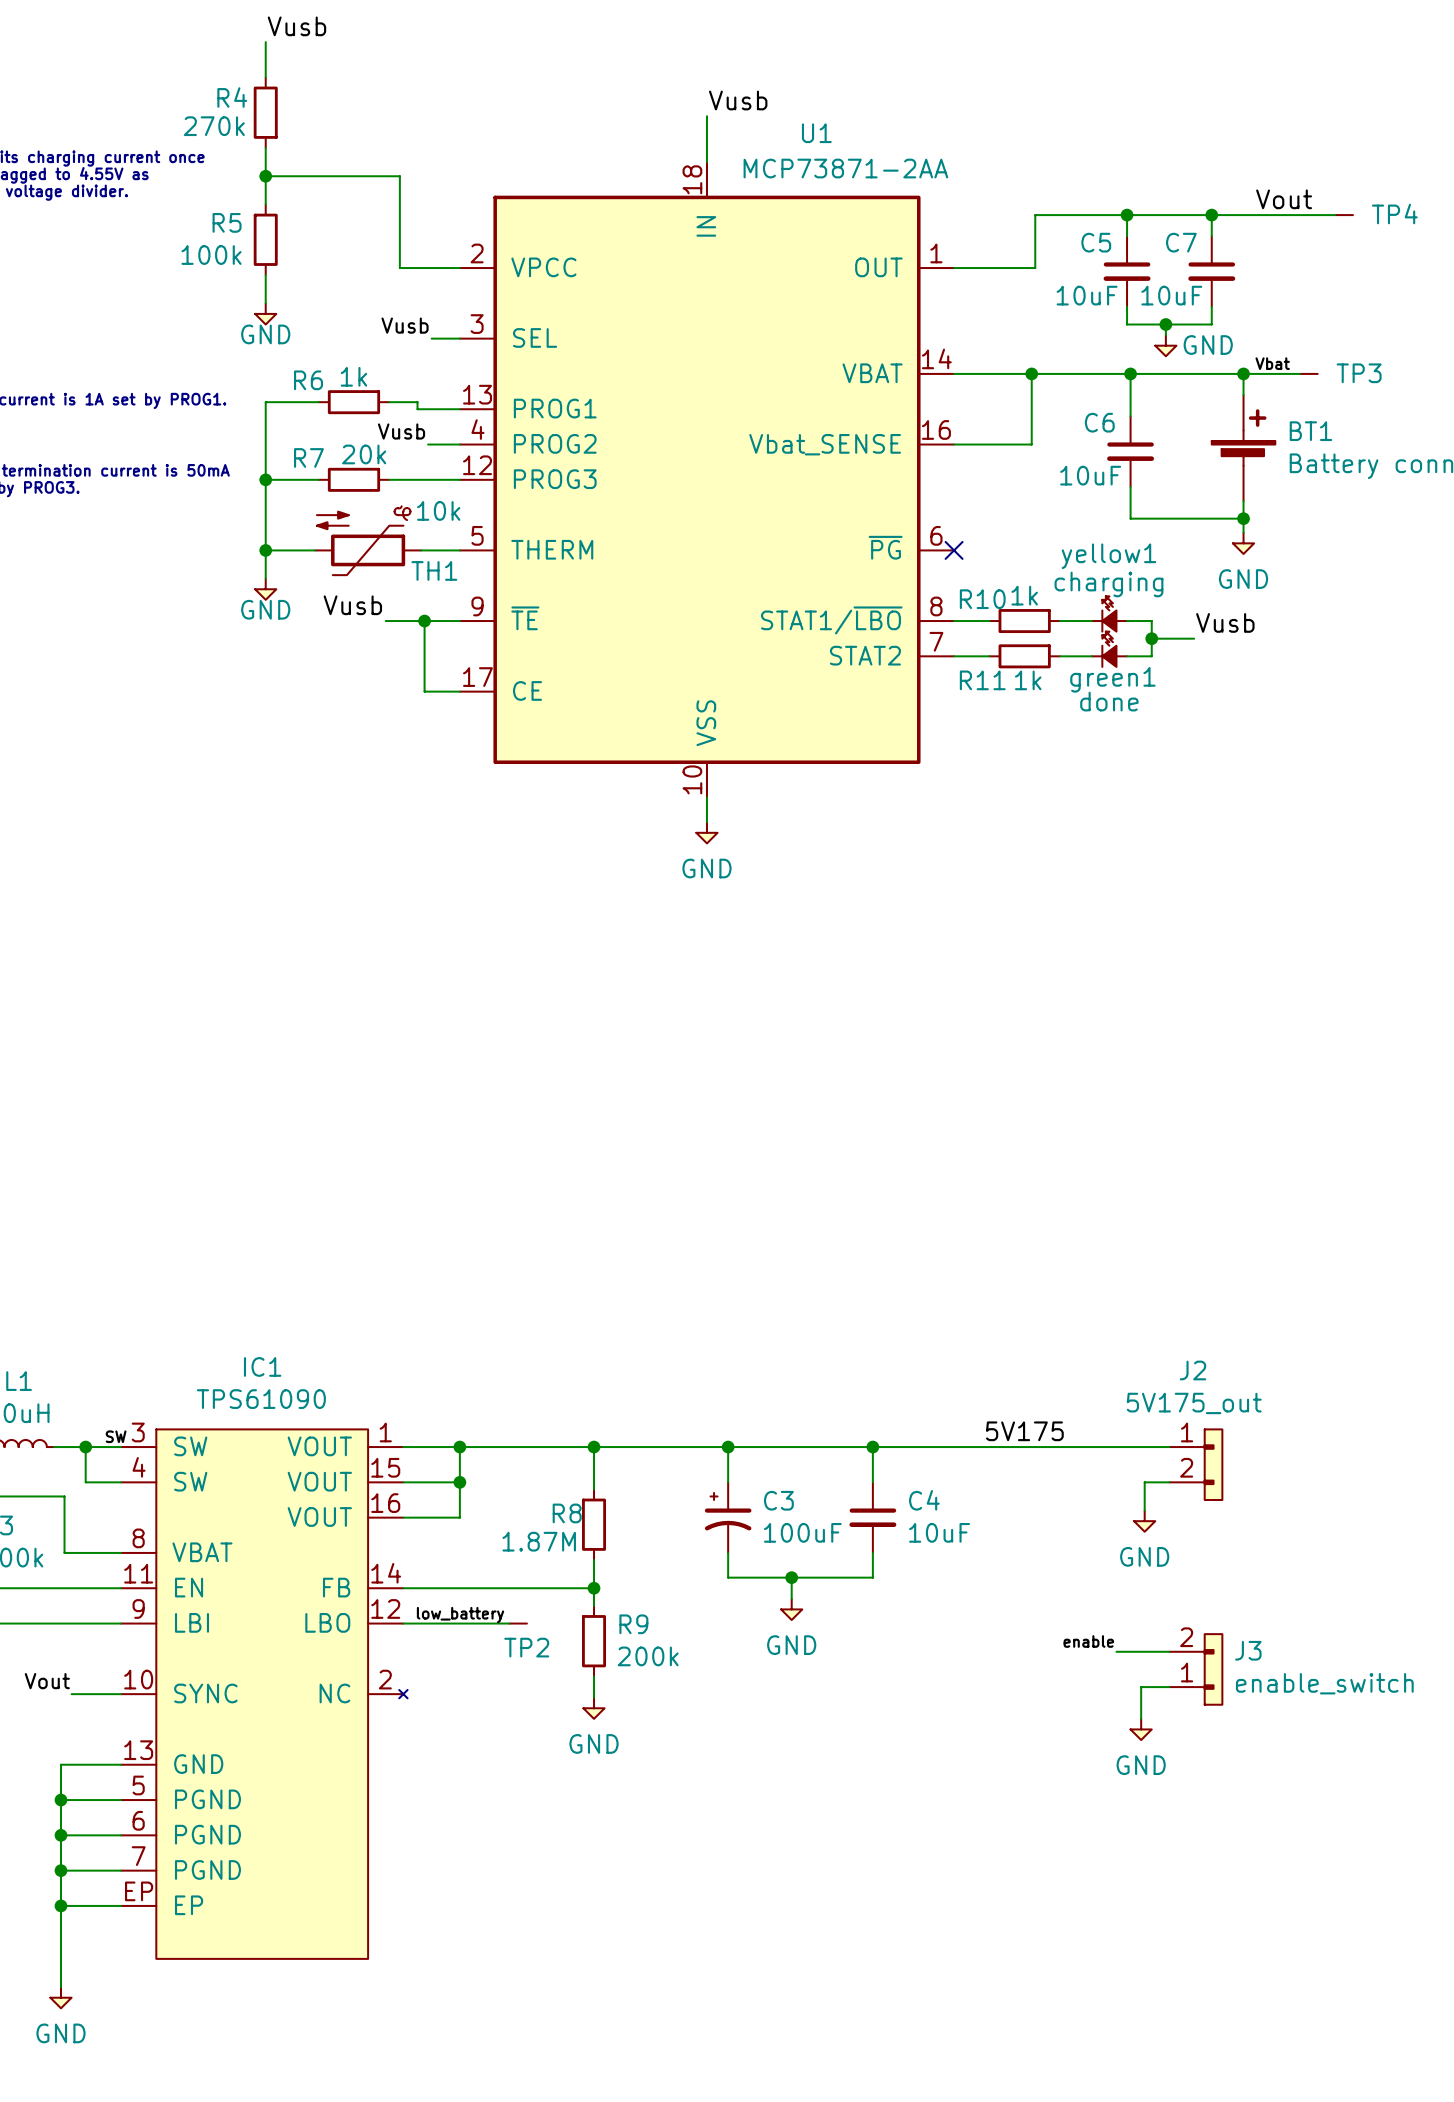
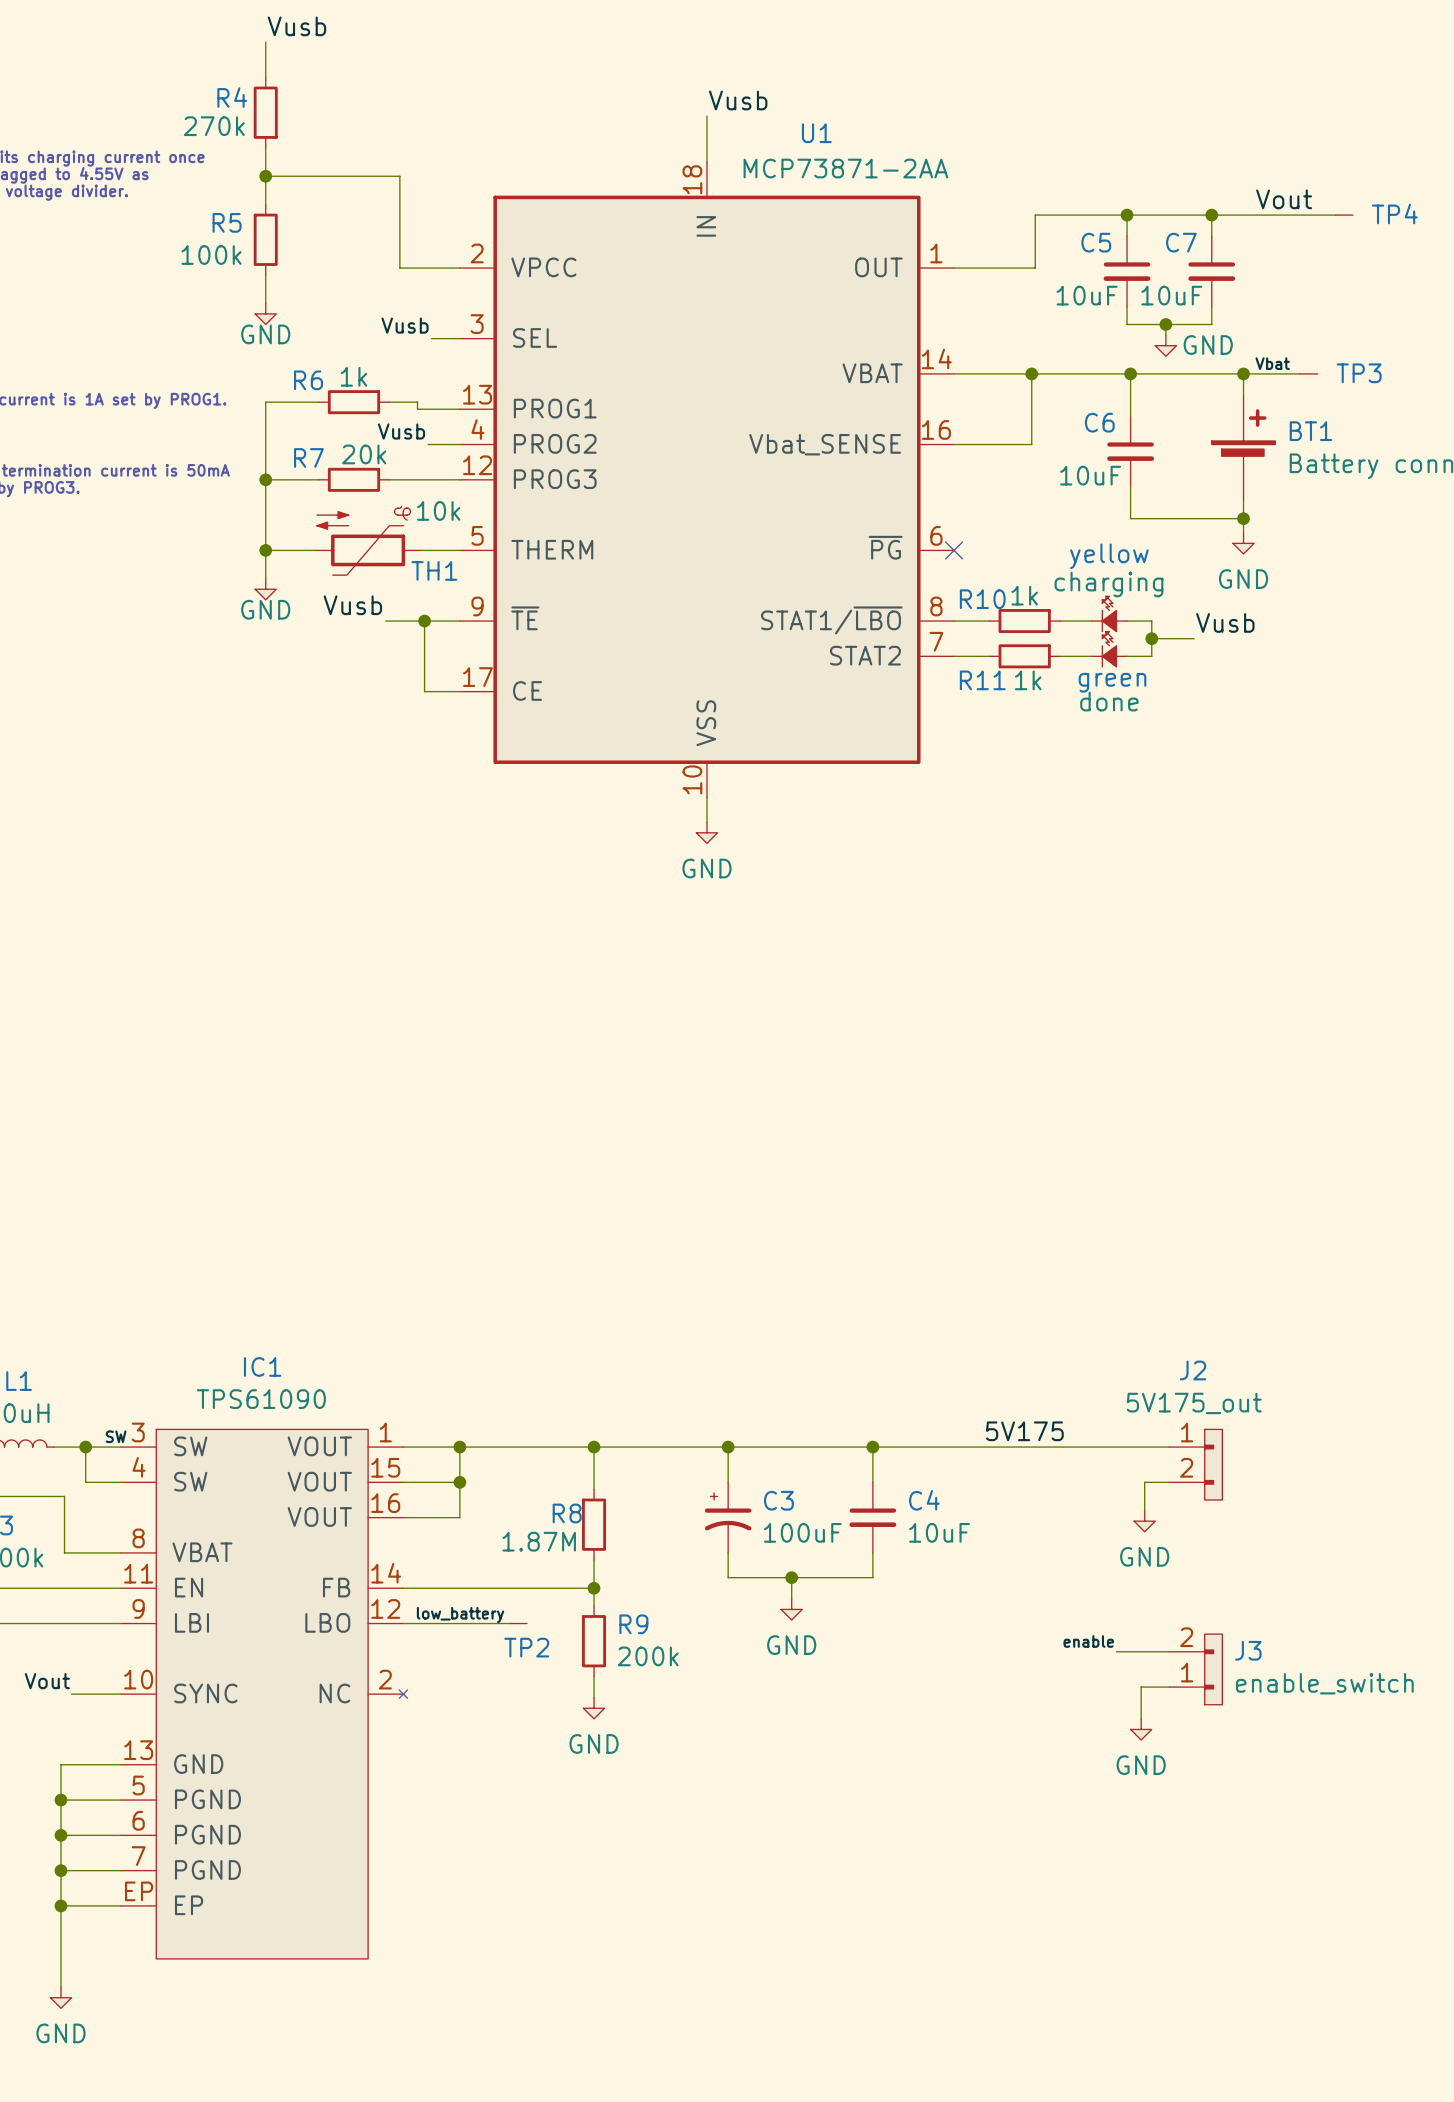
yellow1 name: yellow1 (1108, 556) -> yellow (1109, 556)
green1 name: green1 (1112, 679) -> green (1112, 682)

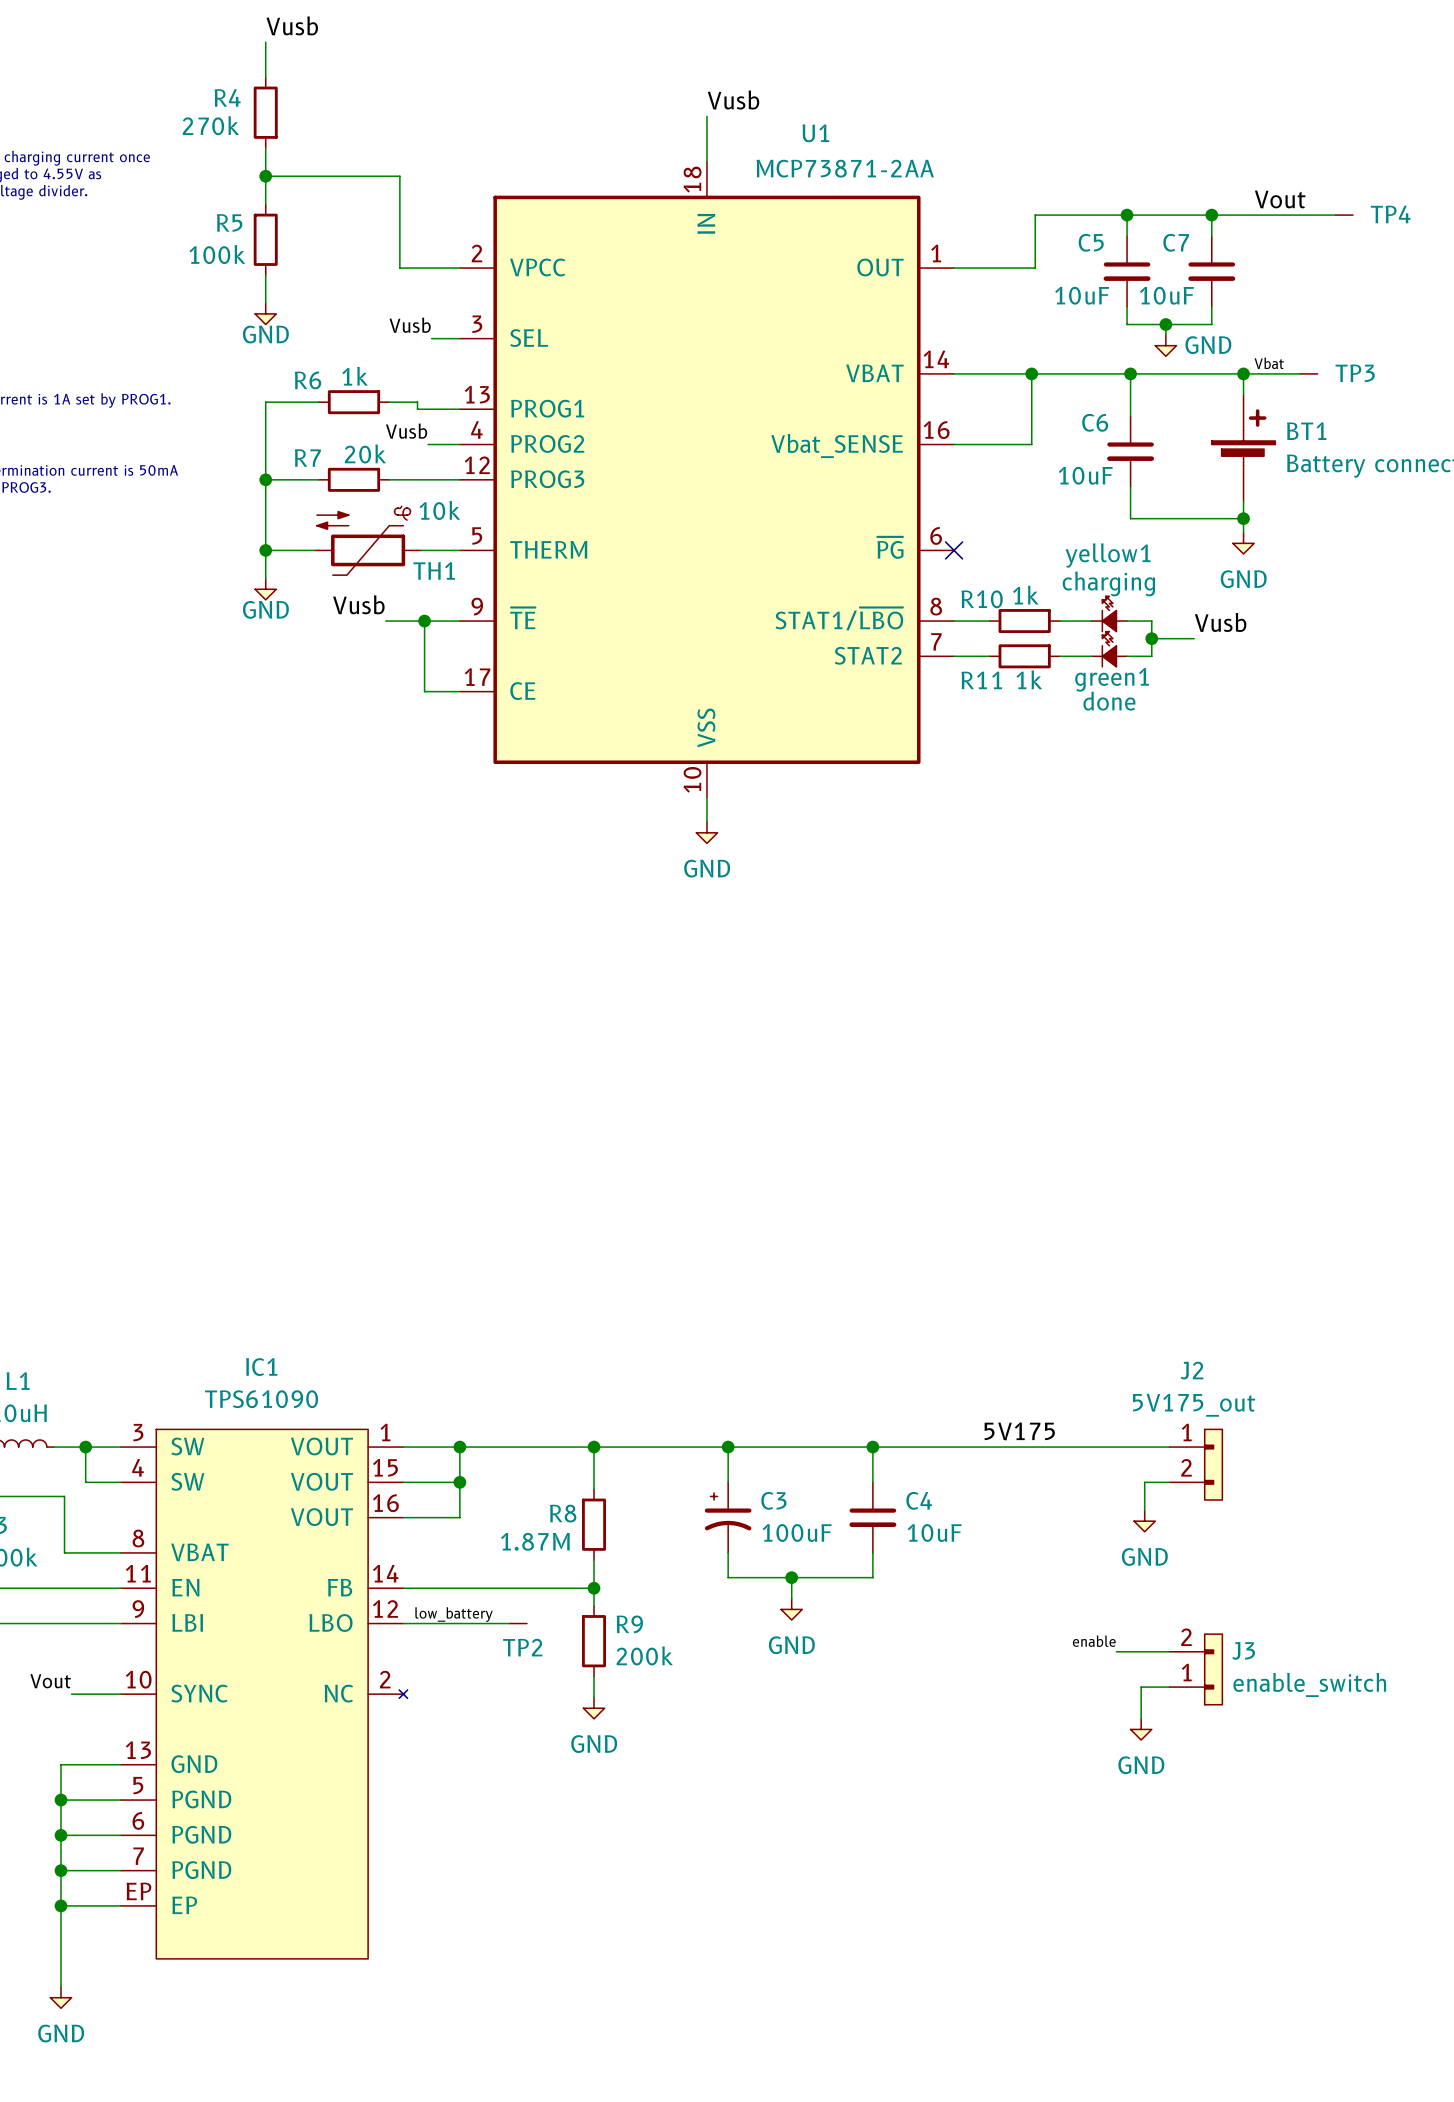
yellow name: yellow (1109, 556) -> yellow1 (1108, 555)
green name: green (1112, 682) -> green1 (1112, 679)
label: SW (116, 1436) -> none

